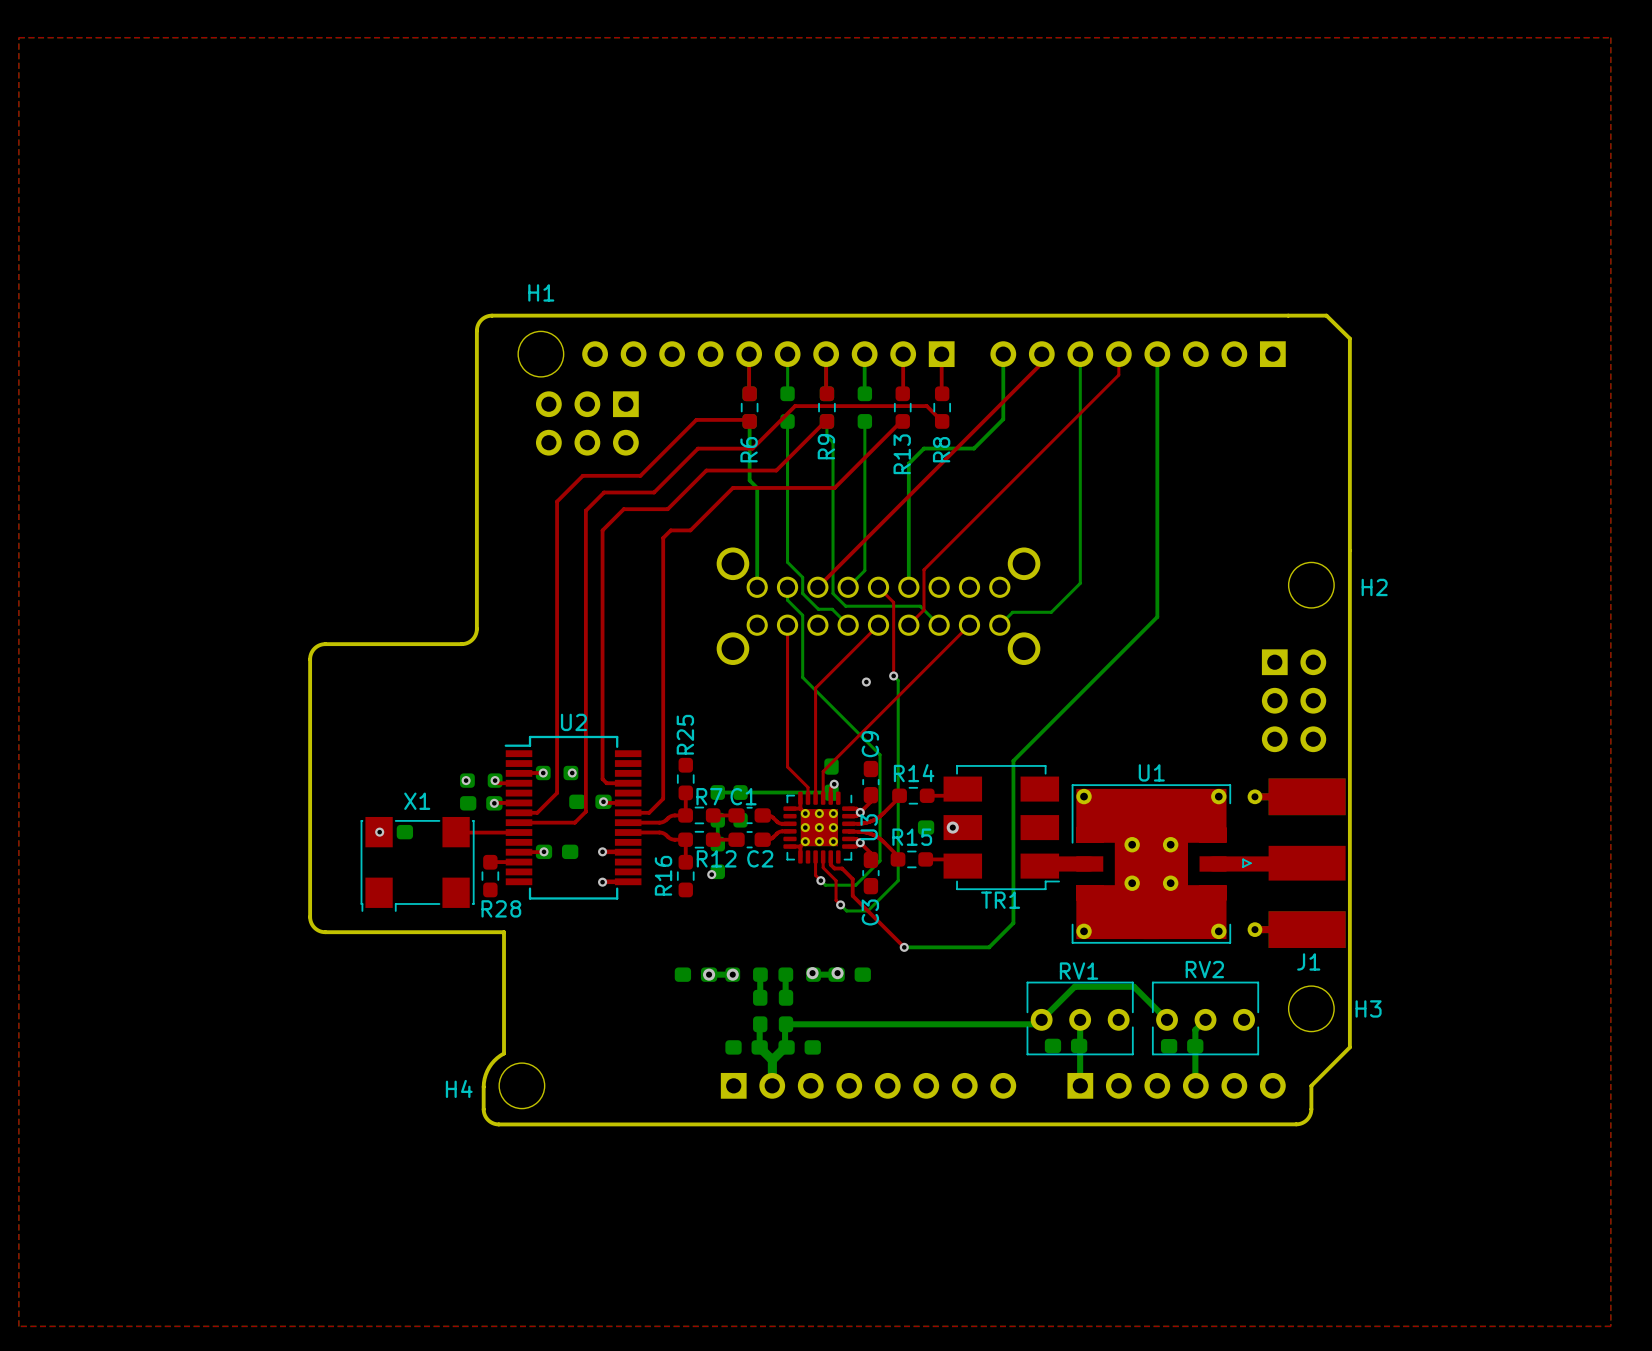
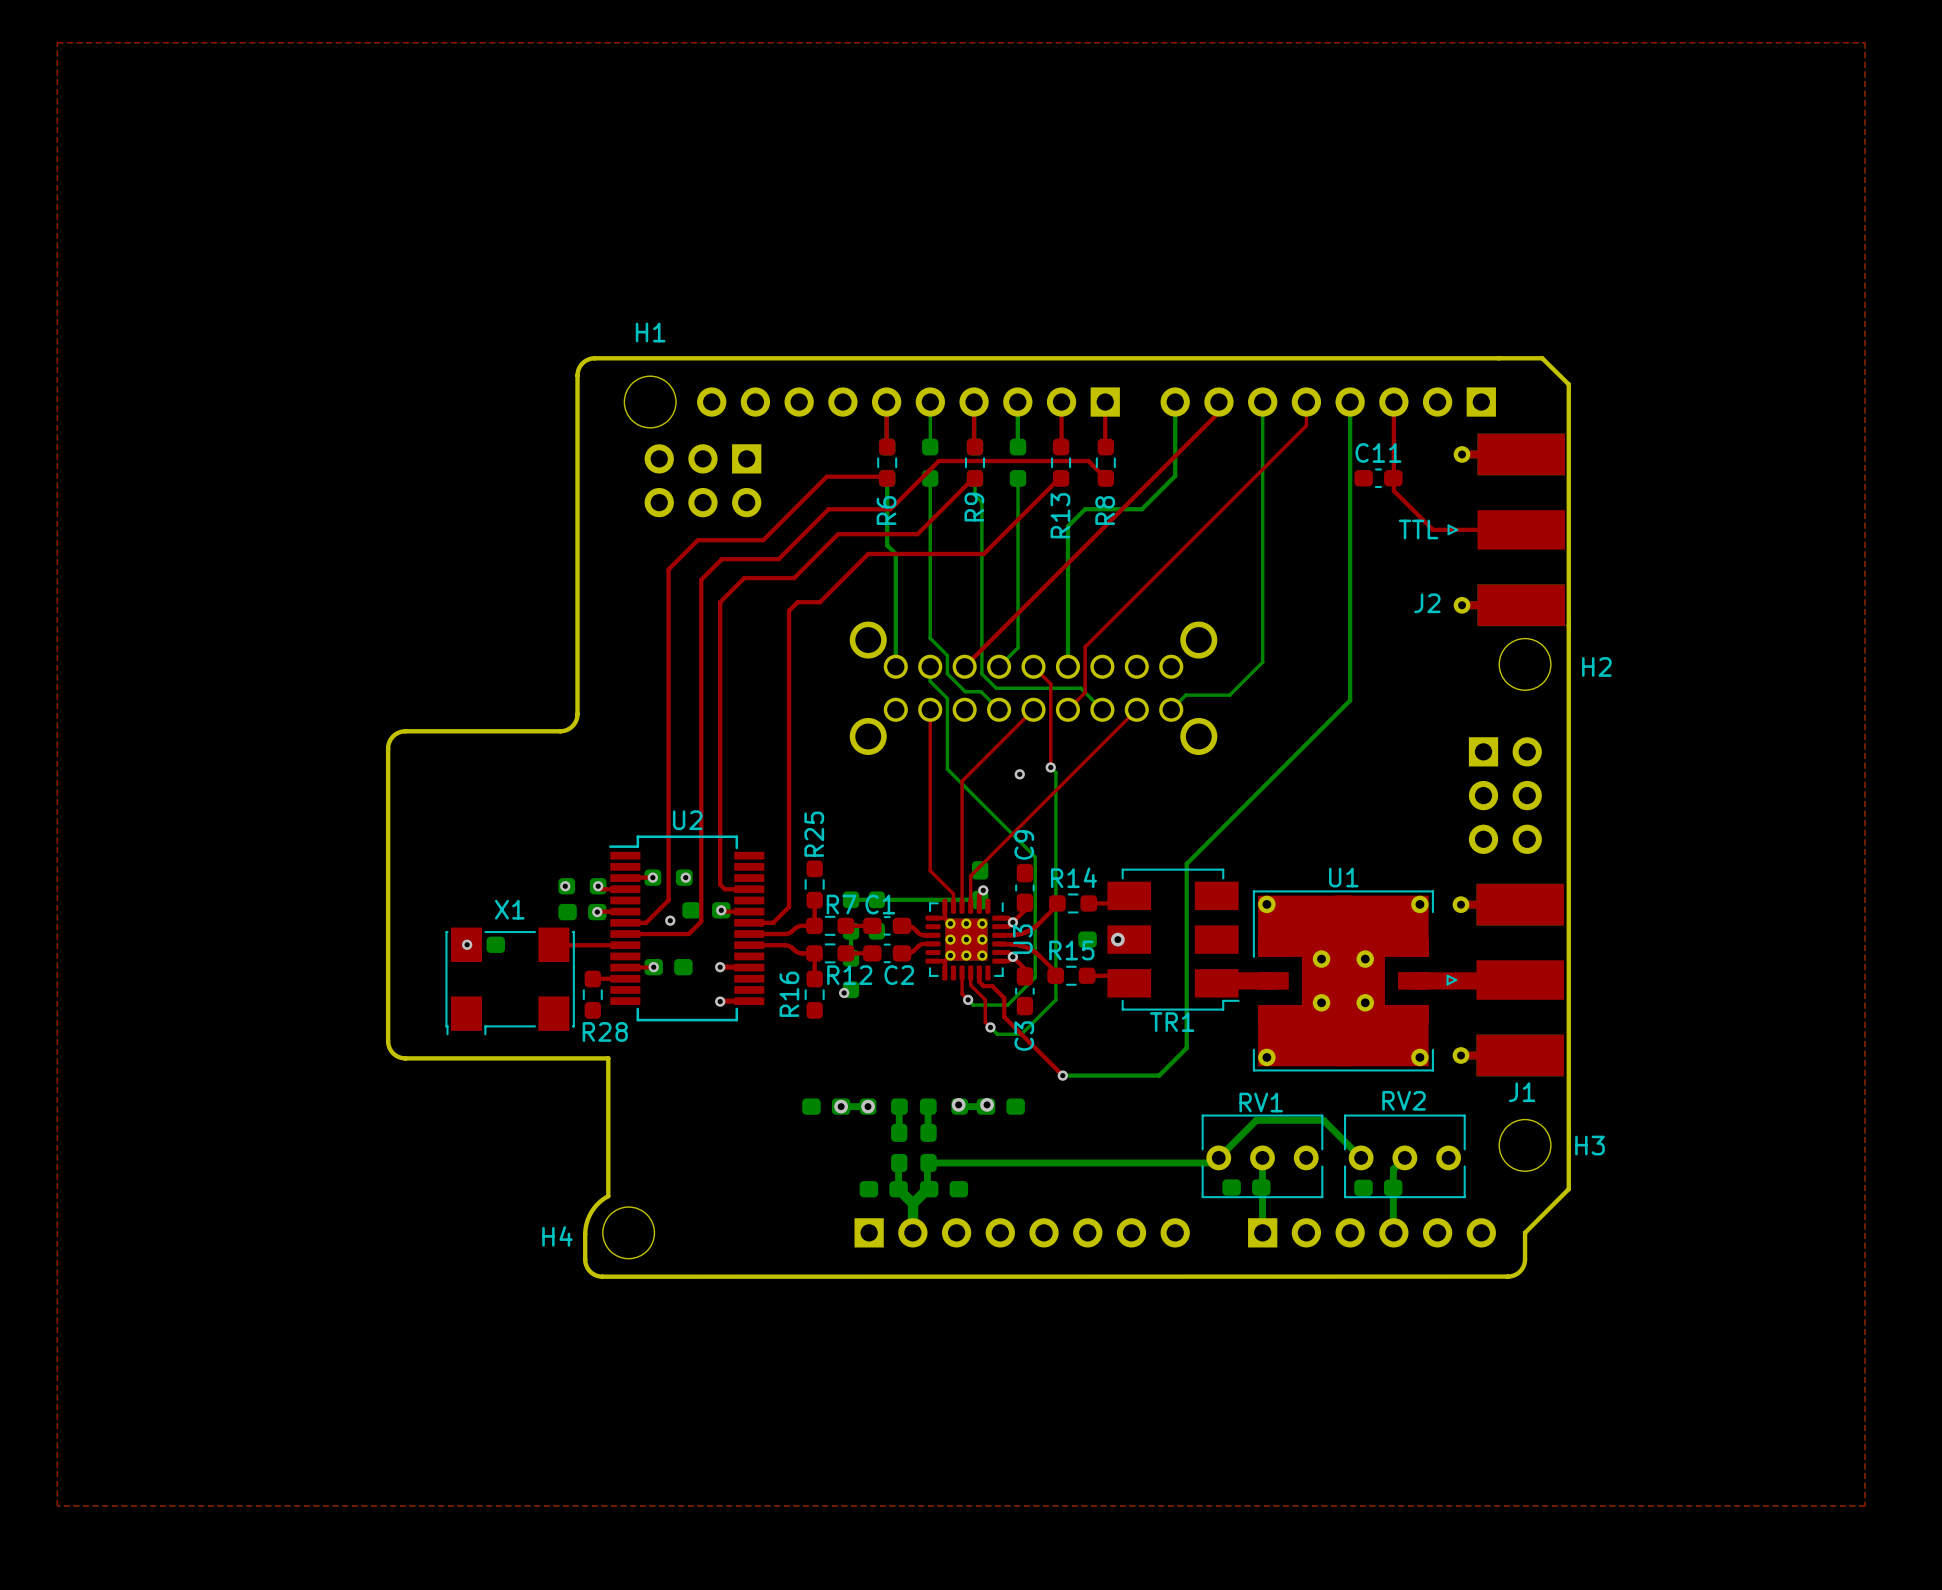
top track: none -> (1393, 402) (1393, 490) (1432, 529) (1520, 529)
C11: none -> (1378, 478)
text: none -> TTL (1418, 529)
J2: none -> (1506, 529)
via: none -> (670, 920)

